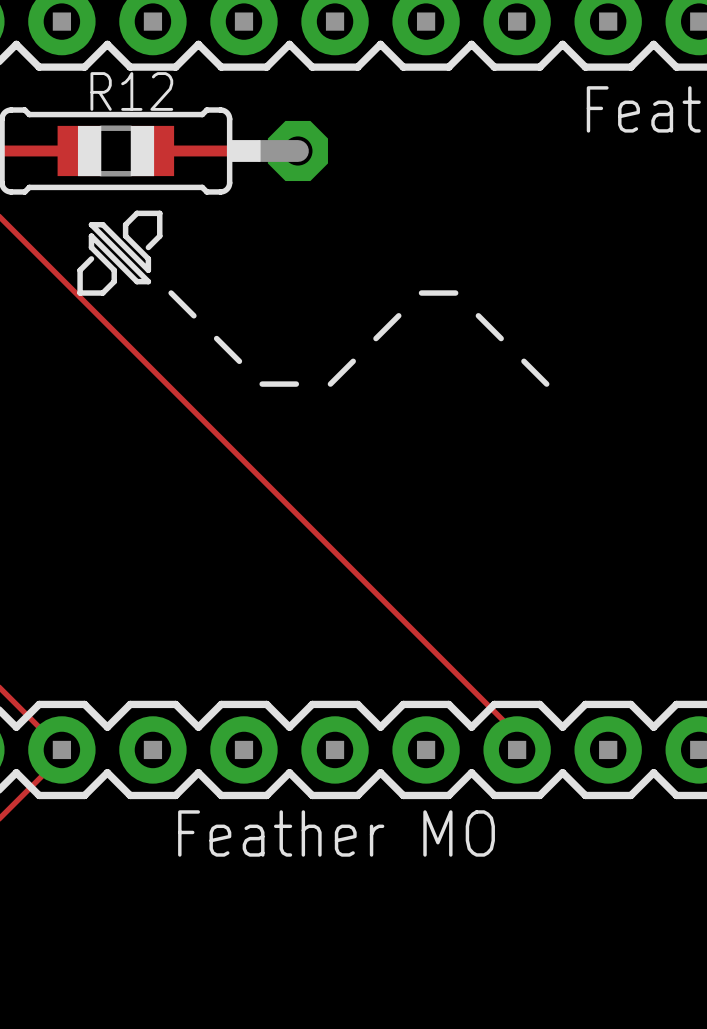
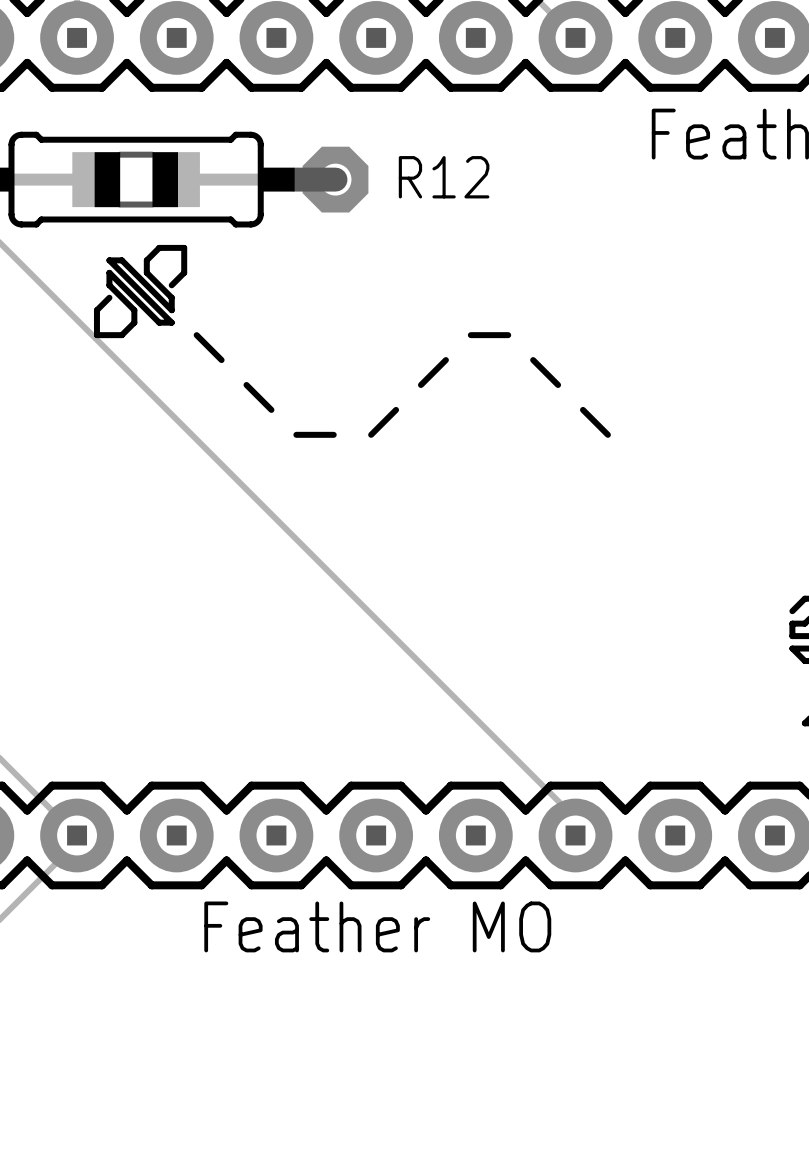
text position: R12 (131, 91) -> R12 (444, 177)

